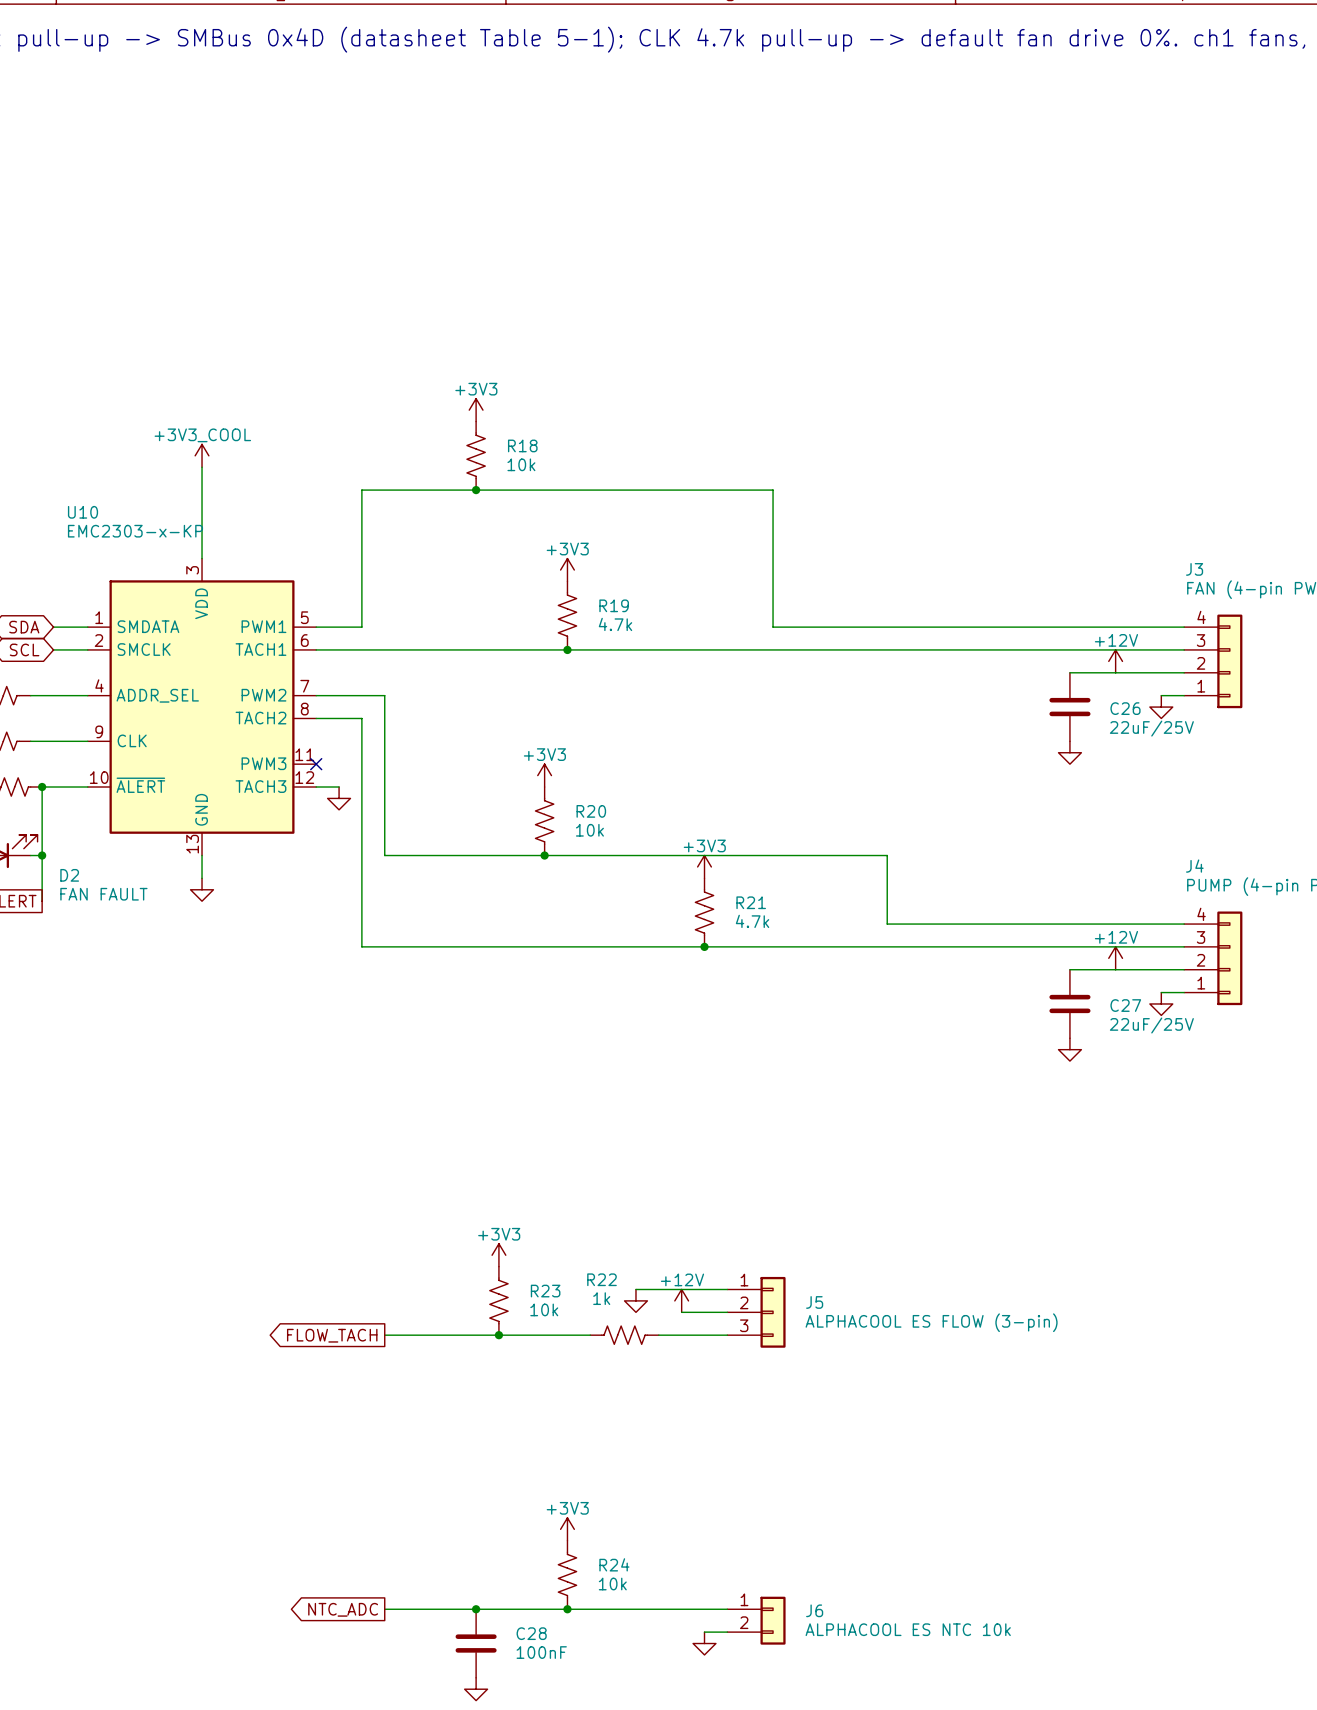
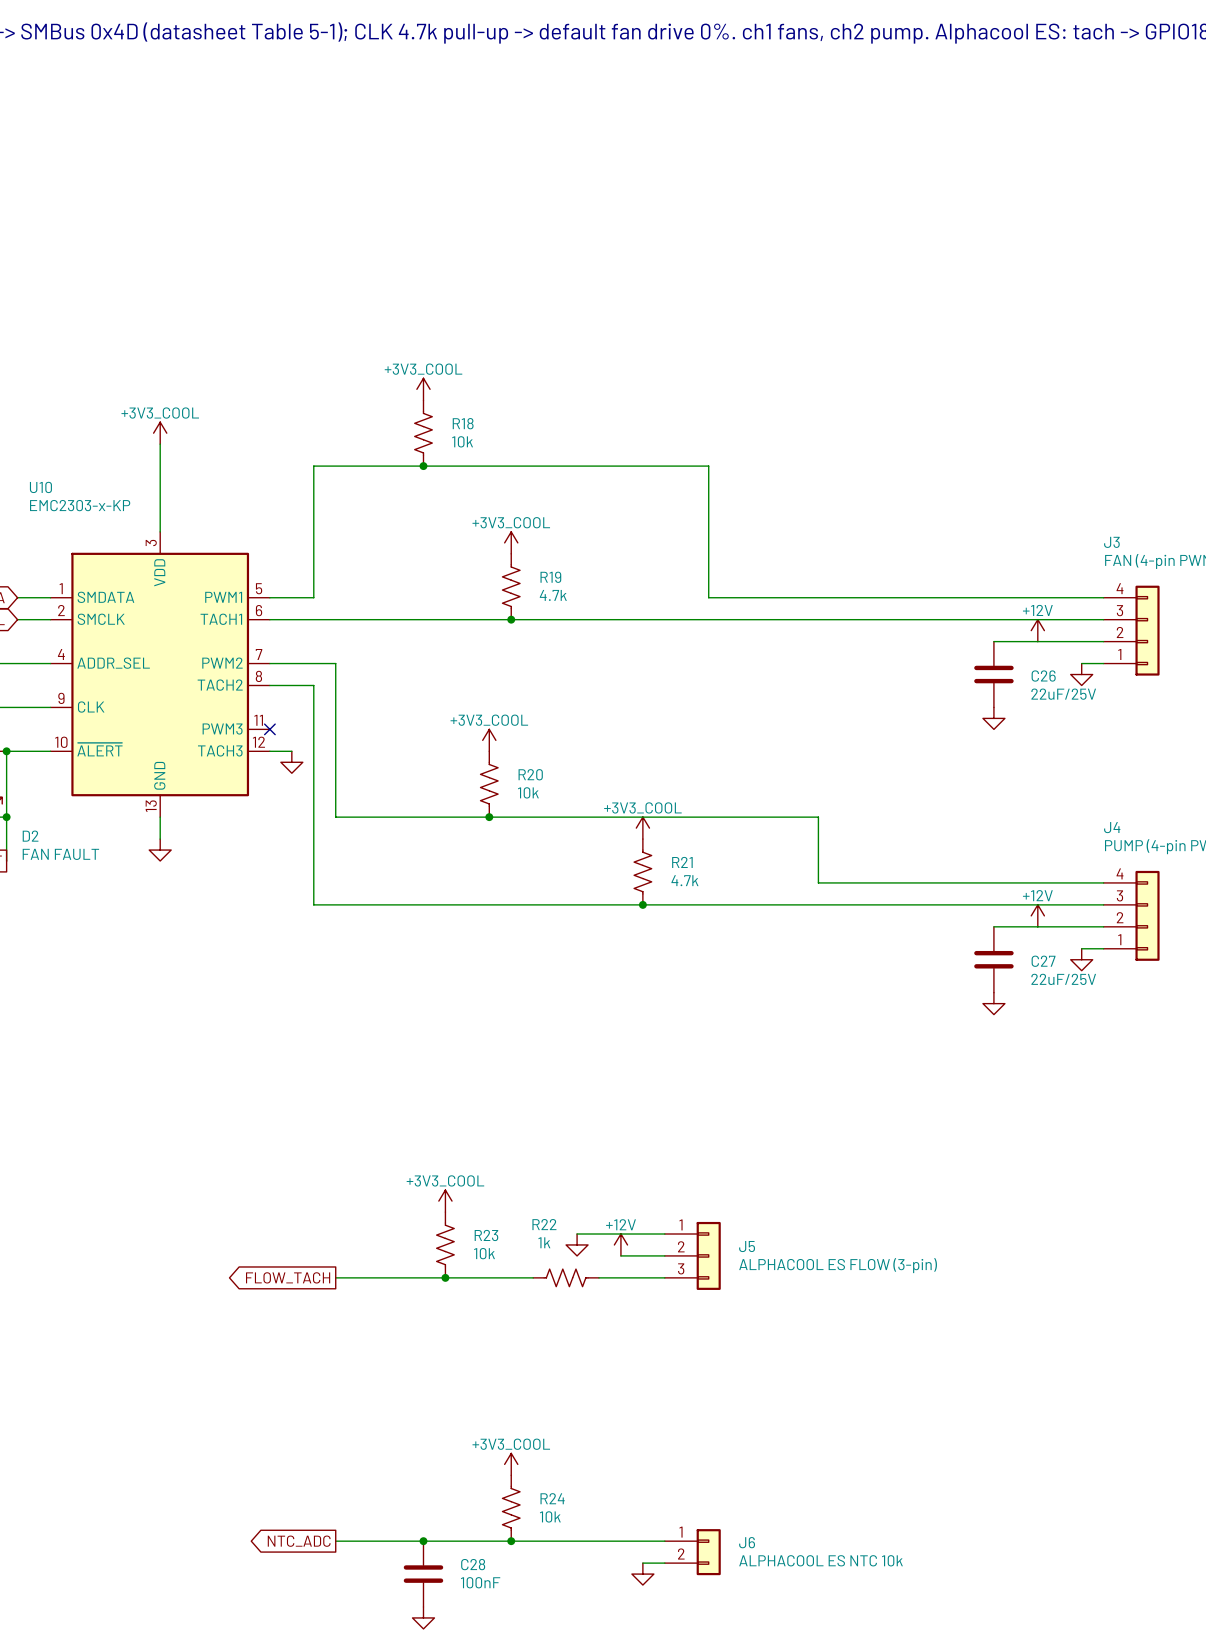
power symbol: +3V3 (476, 410) -> +3V3_COOL (423, 389)
power symbol: +3V3 (567, 570) -> +3V3_COOL (511, 542)
power symbol: +3V3 (544, 775) -> +3V3_COOL (489, 740)
power symbol: +3V3 (704, 866) -> +3V3_COOL (642, 828)
power symbol: +3V3 (498, 1255) -> +3V3_COOL (445, 1201)
power symbol: +3V3 (567, 1529) -> +3V3_COOL (511, 1464)

